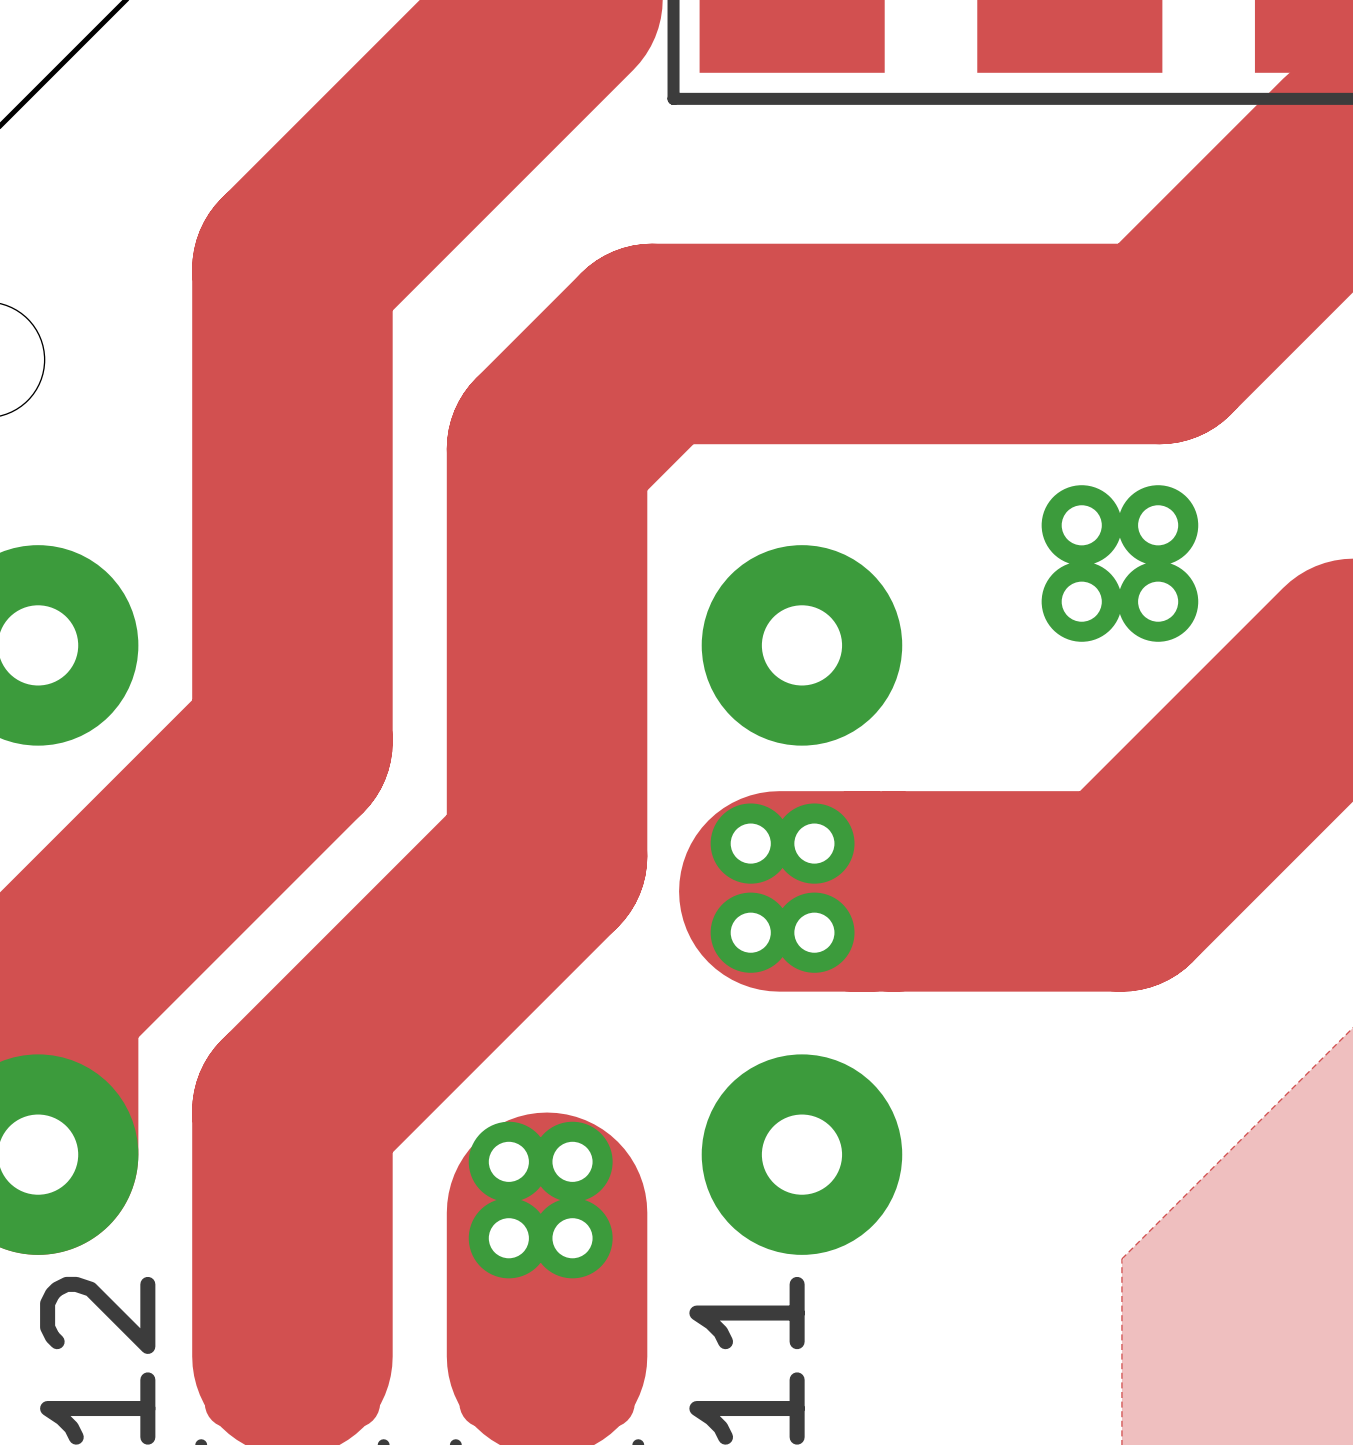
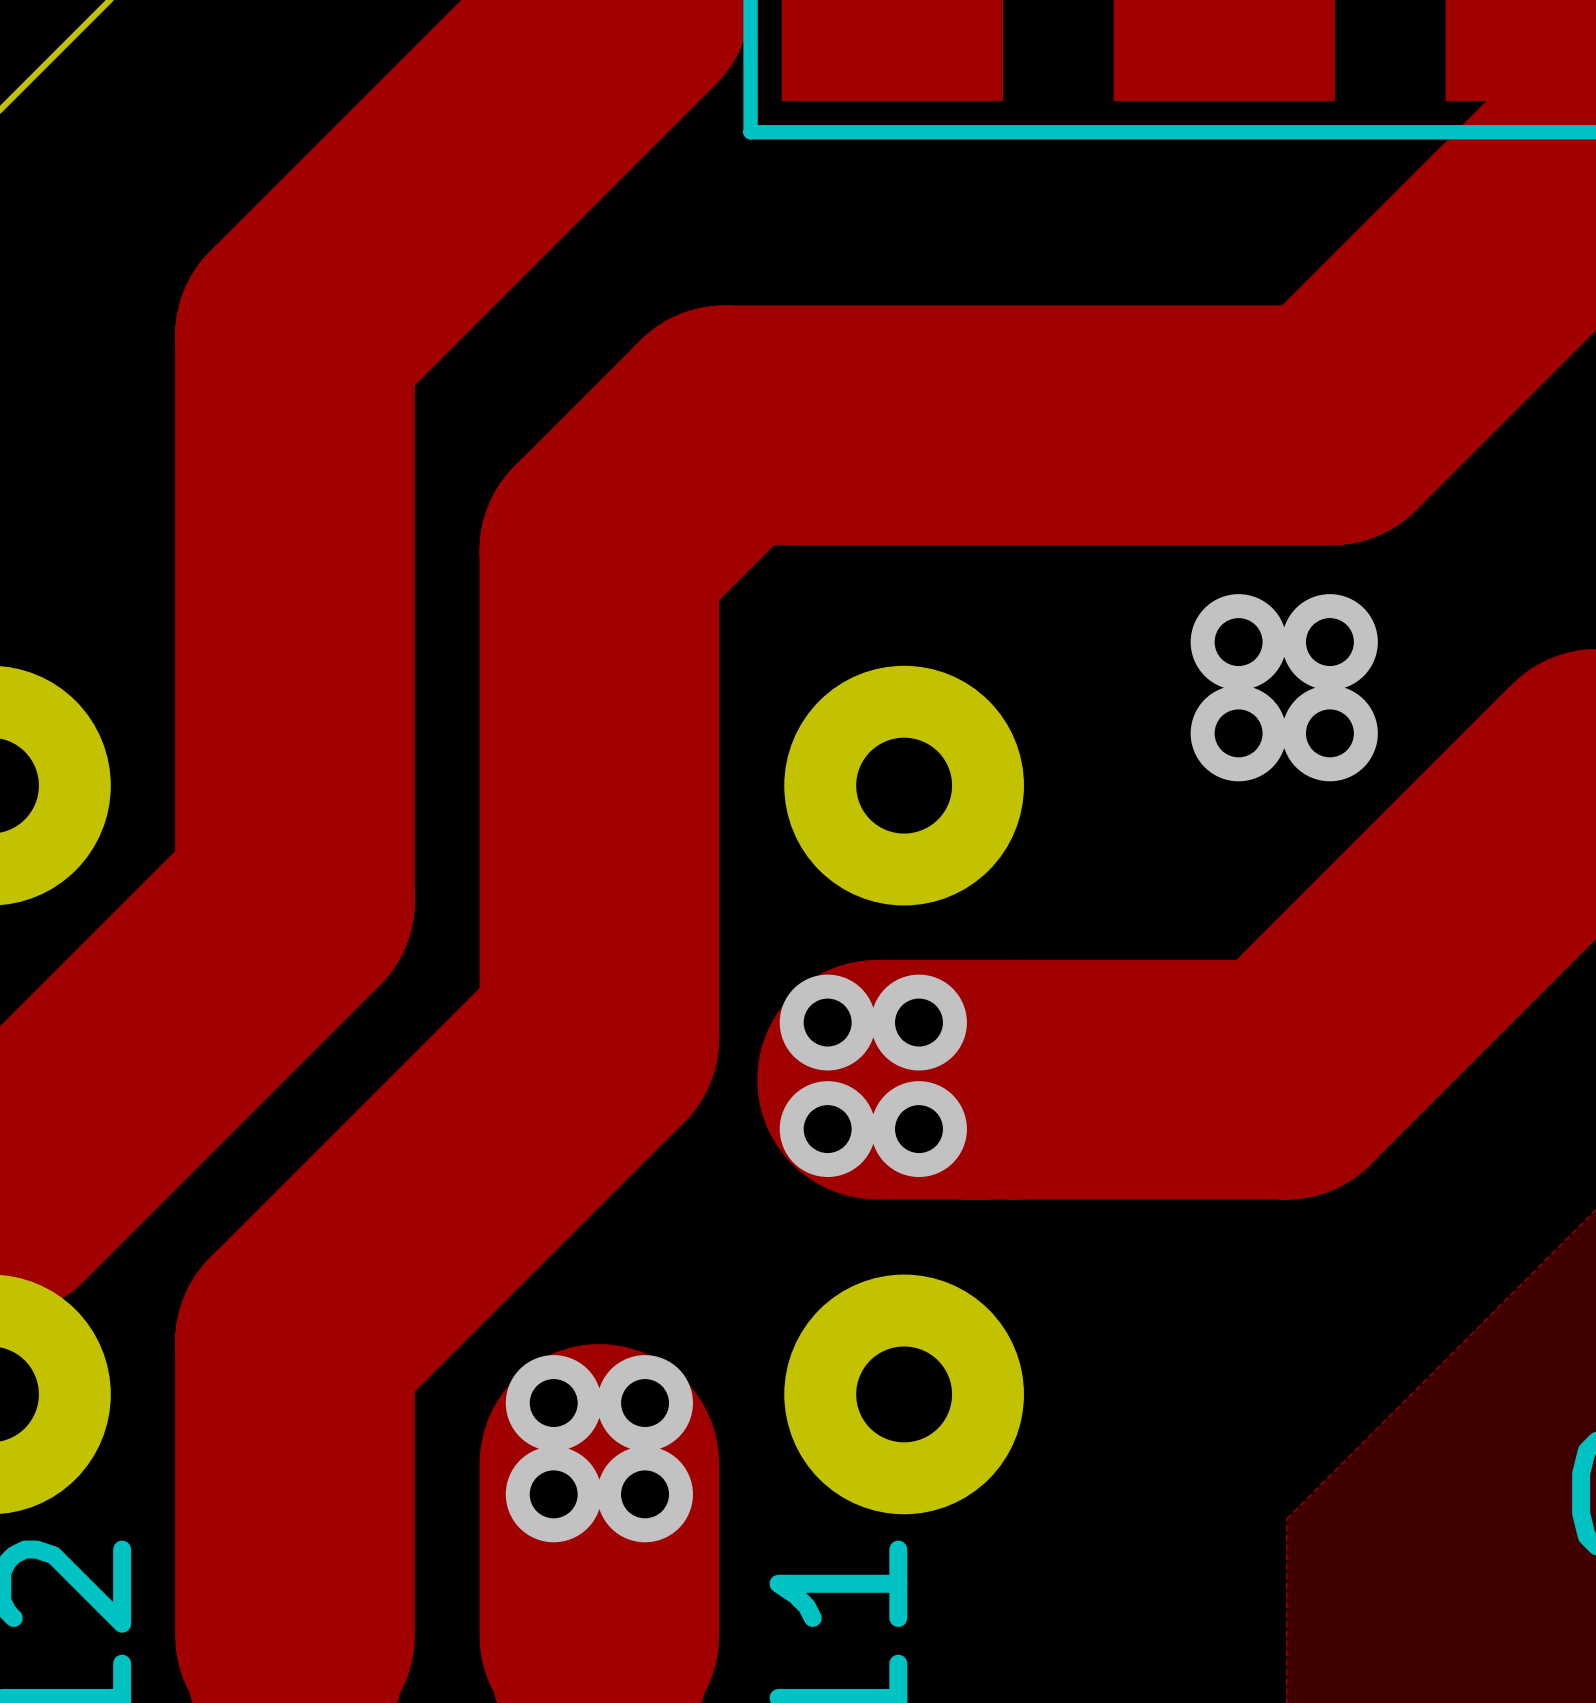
via position: (750, 843) -> (827, 1022)
via position: (750, 932) -> (827, 1129)
via position: (572, 1161) -> (645, 1403)
via position: (572, 1238) -> (645, 1494)

